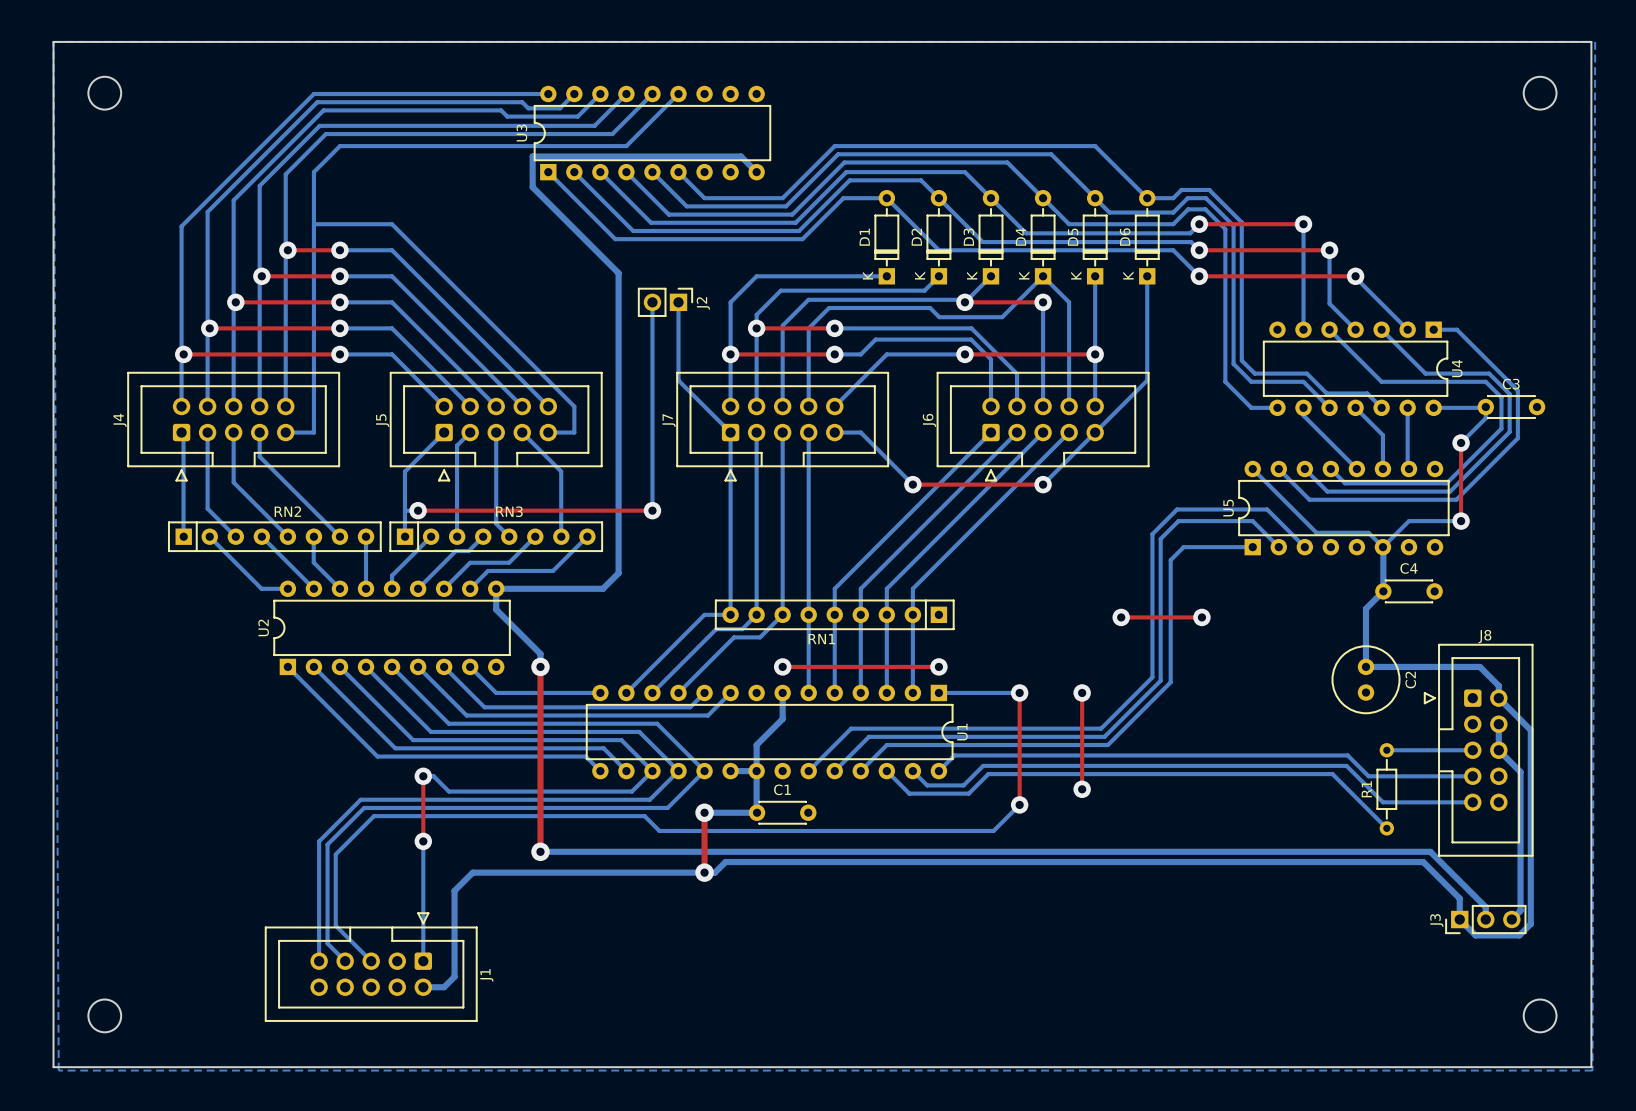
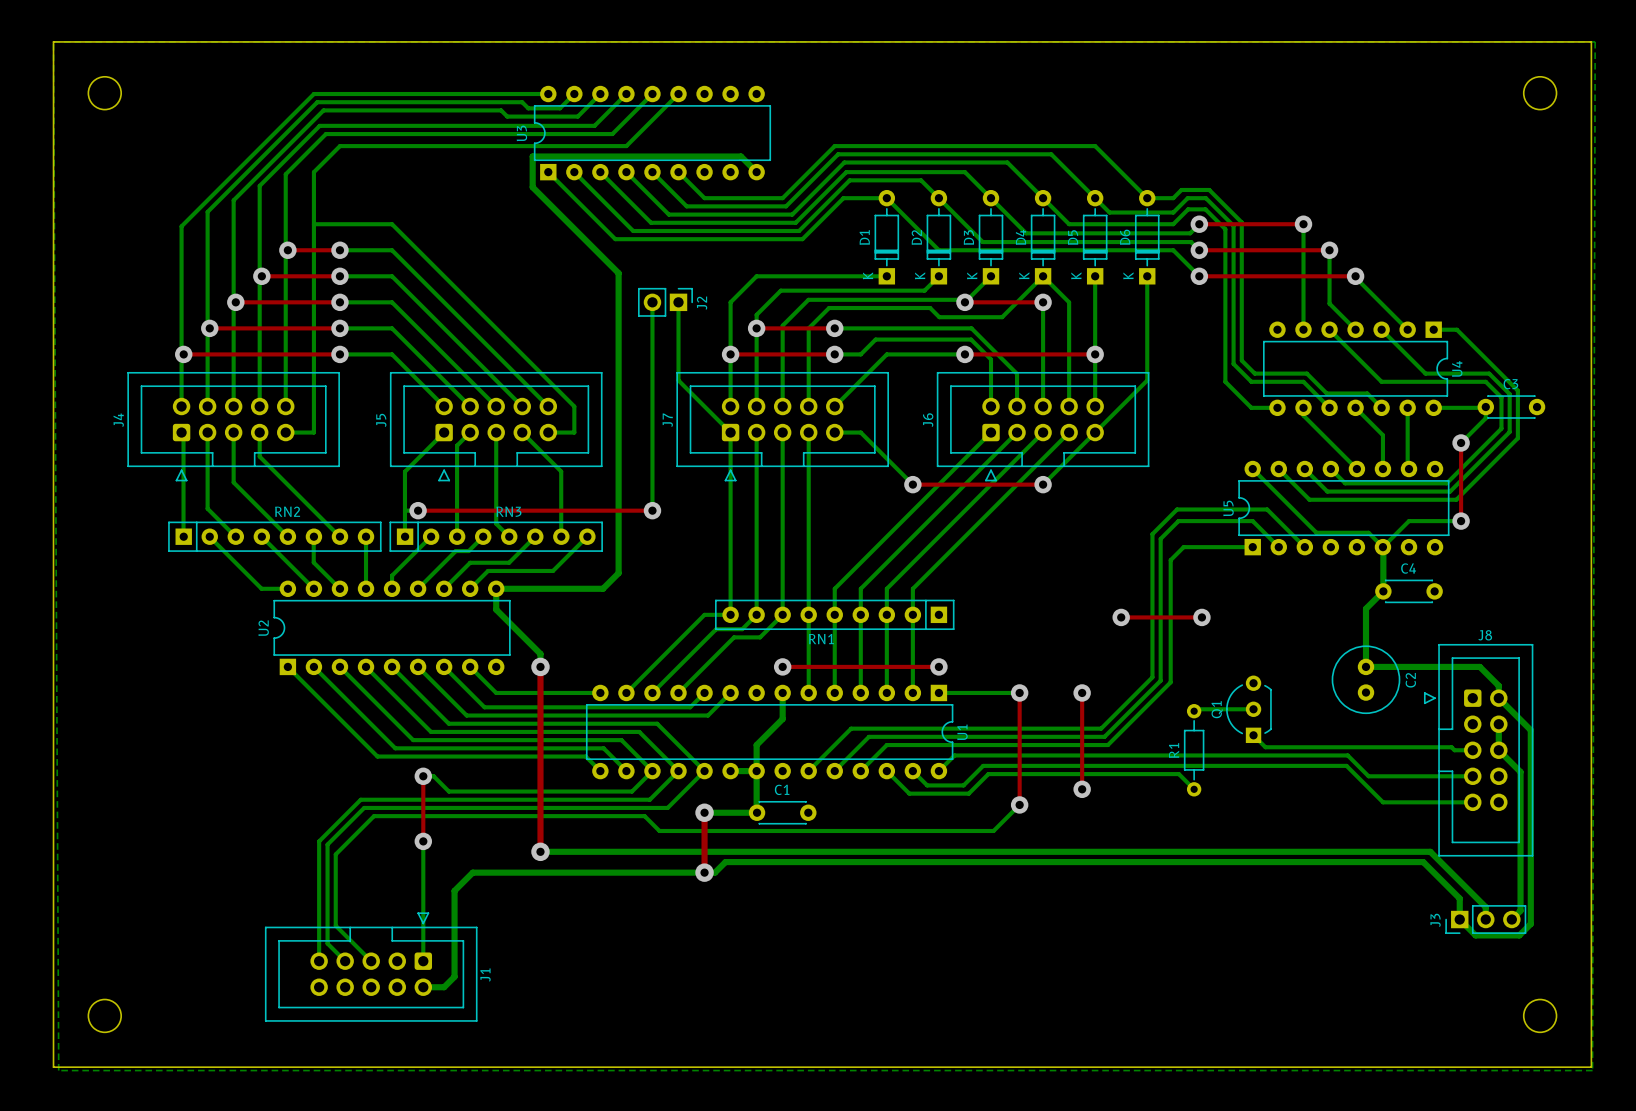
bottom track: none -> (1196, 709) (1253, 709)
Q1: none -> (1248, 709)
bottom track: (1386, 750) (1454, 750) -> (1253, 735) (1265, 747) (1451, 747) (1454, 750)
bottom track: (1178, 774) (1332, 774) (1386, 828) -> (1178, 774) (1194, 789)
R1 position: (1386, 789) -> (1194, 750)

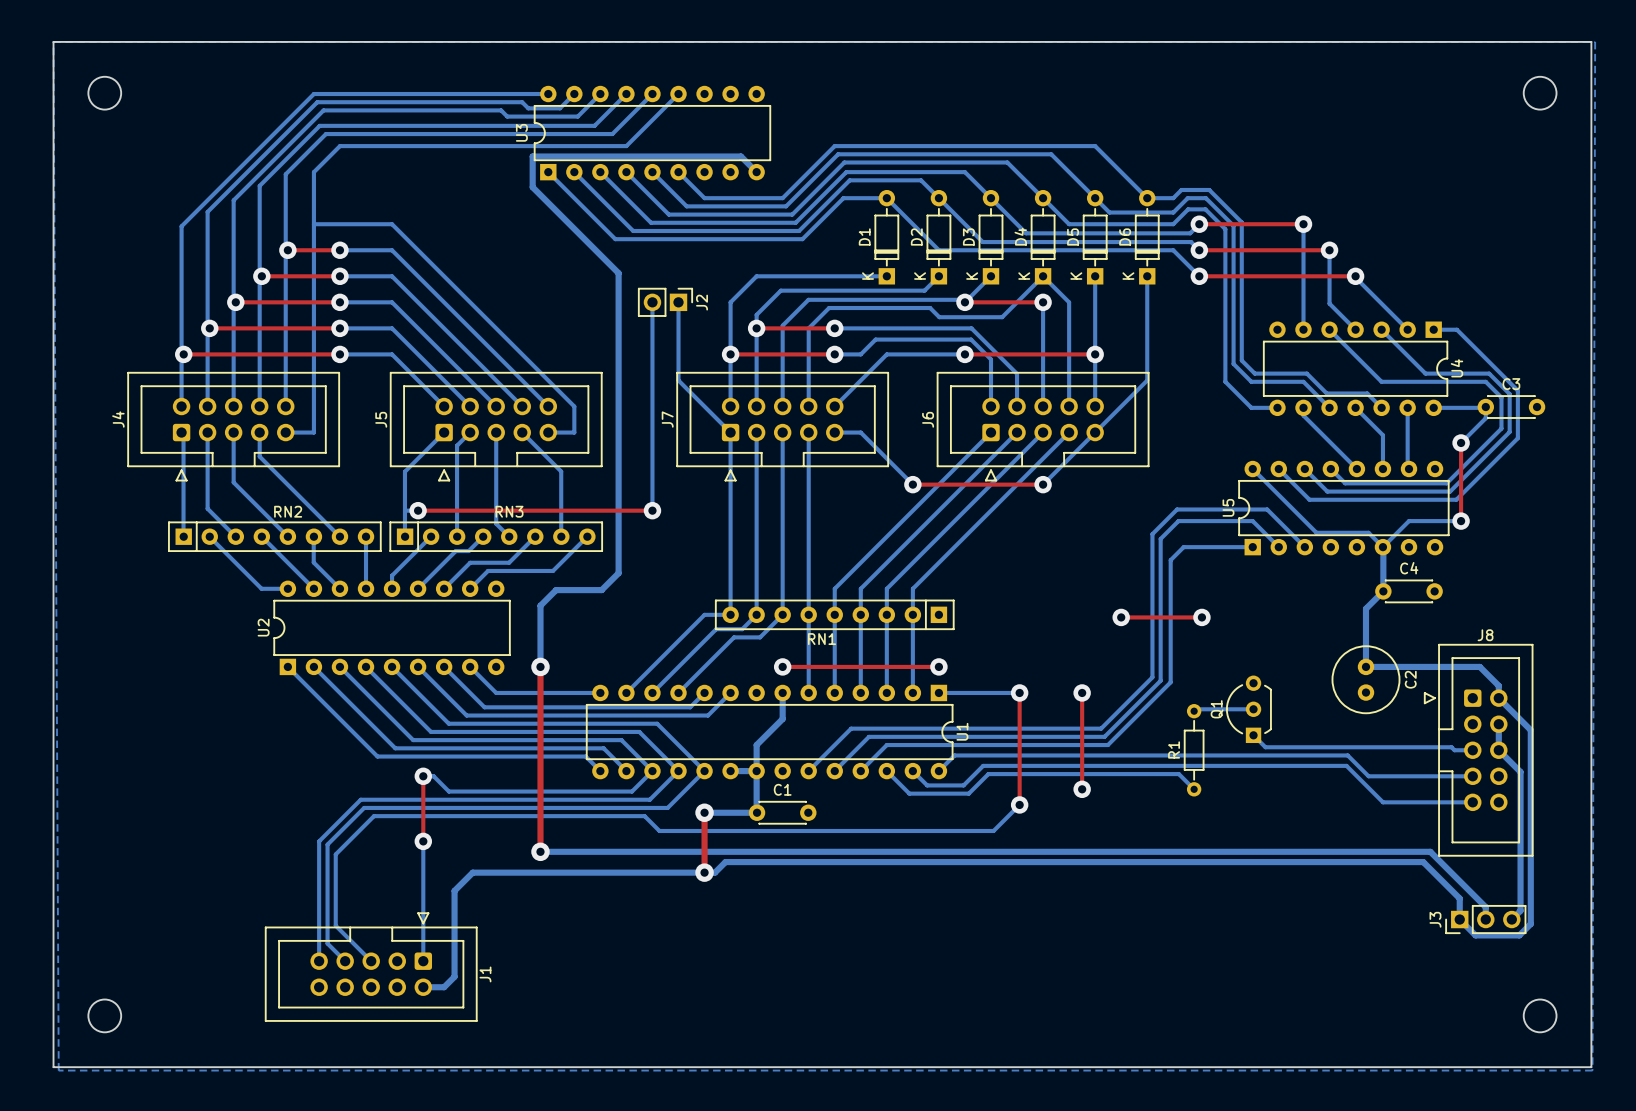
bottom track: (602, 588) (496, 588) (496, 609) (540, 653) -> (602, 588) (556, 590) (540, 605) (540, 653)

